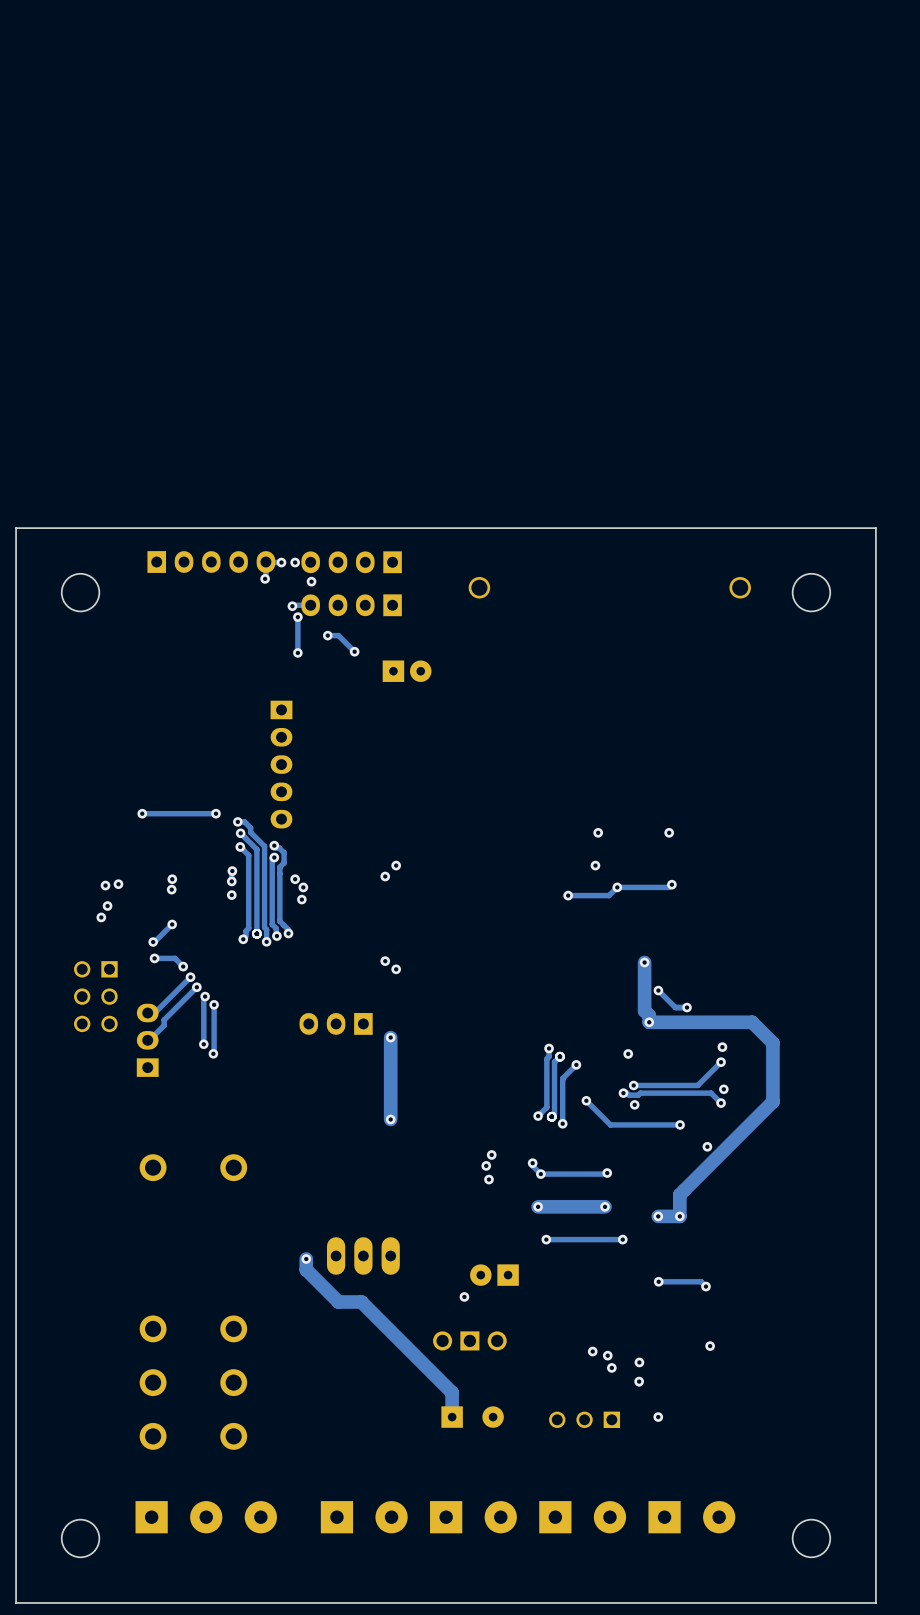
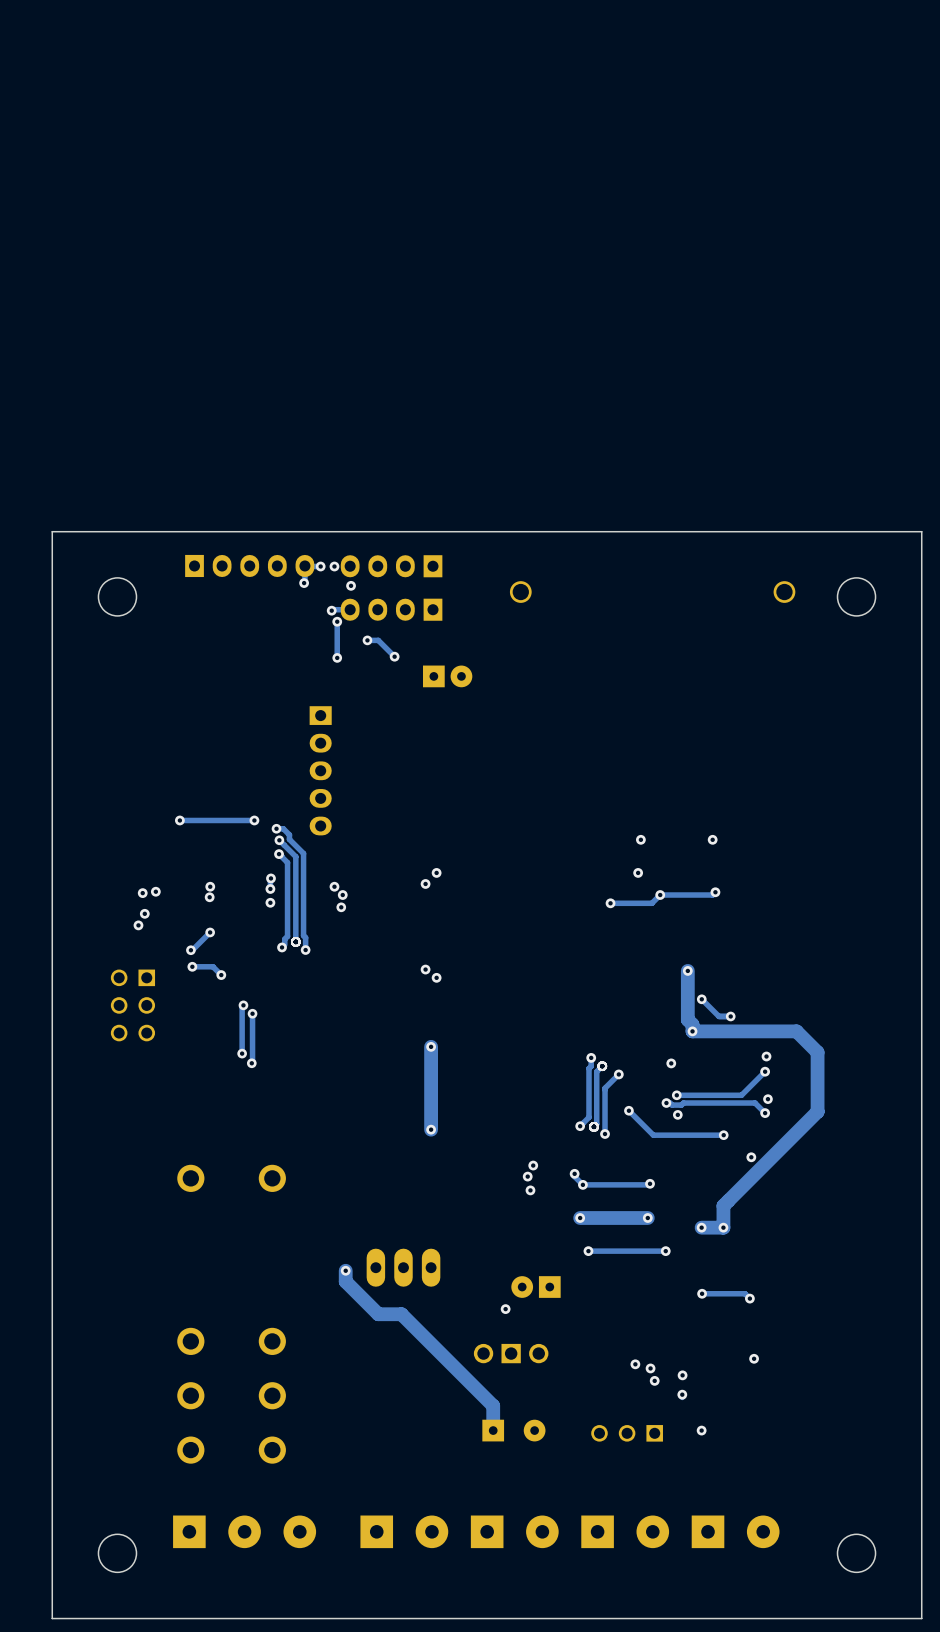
track: (274, 845) (284, 852) (284, 863) (279, 867) (279, 921) (288, 929) (288, 933) -> none
via: (274, 845) -> none
track: (274, 857) (272, 858) (272, 924) (276, 928) (276, 936) -> none
via: (274, 857) -> none
via: (288, 933) -> none
via: (276, 936) -> none
track: (190, 977) (154, 1013) (147, 1013) -> none
via: (190, 977) -> none
track: (196, 987) (164, 1020) (164, 1025) (147, 1040) -> none
via: (196, 987) -> none
part: (336, 1023) -> none
part: (147, 1040) -> none

